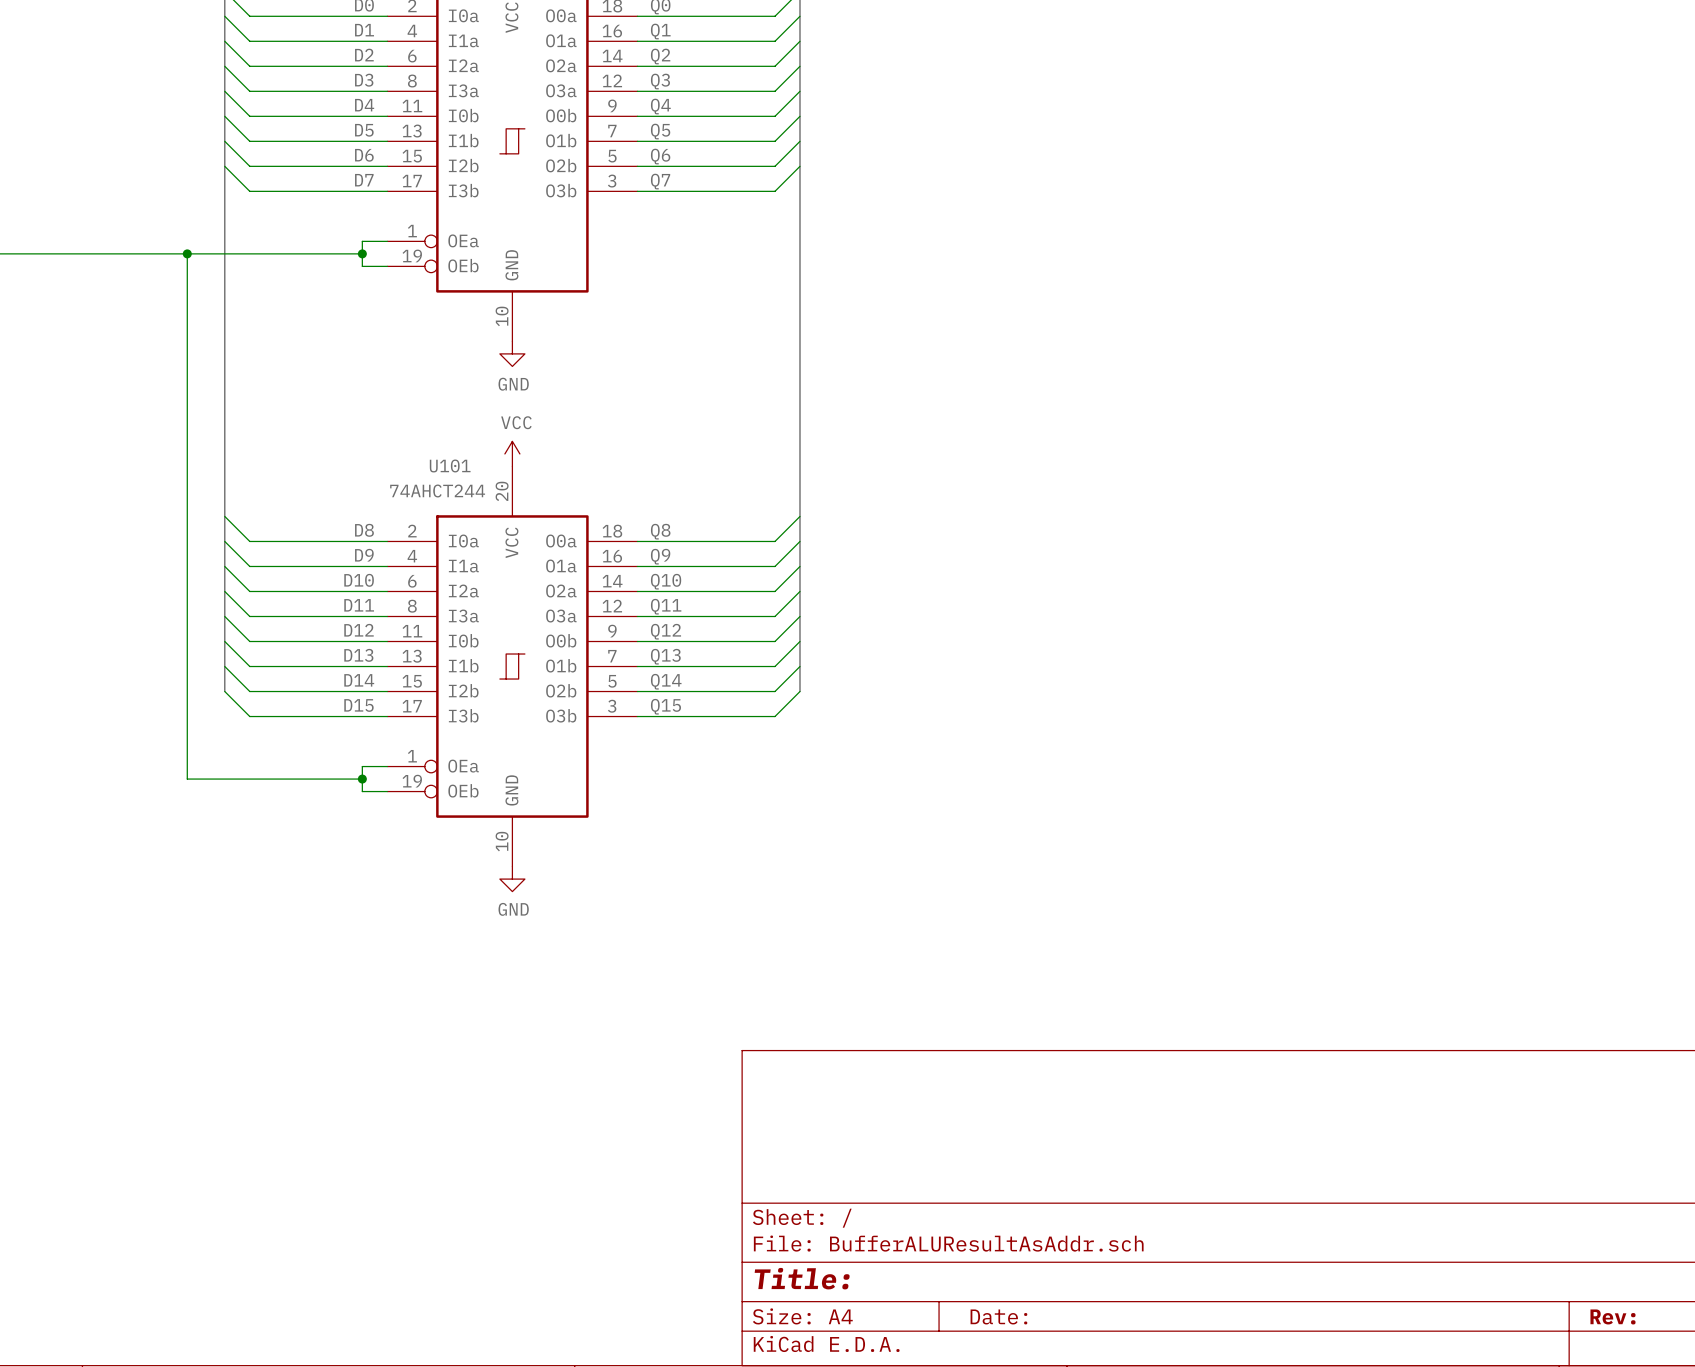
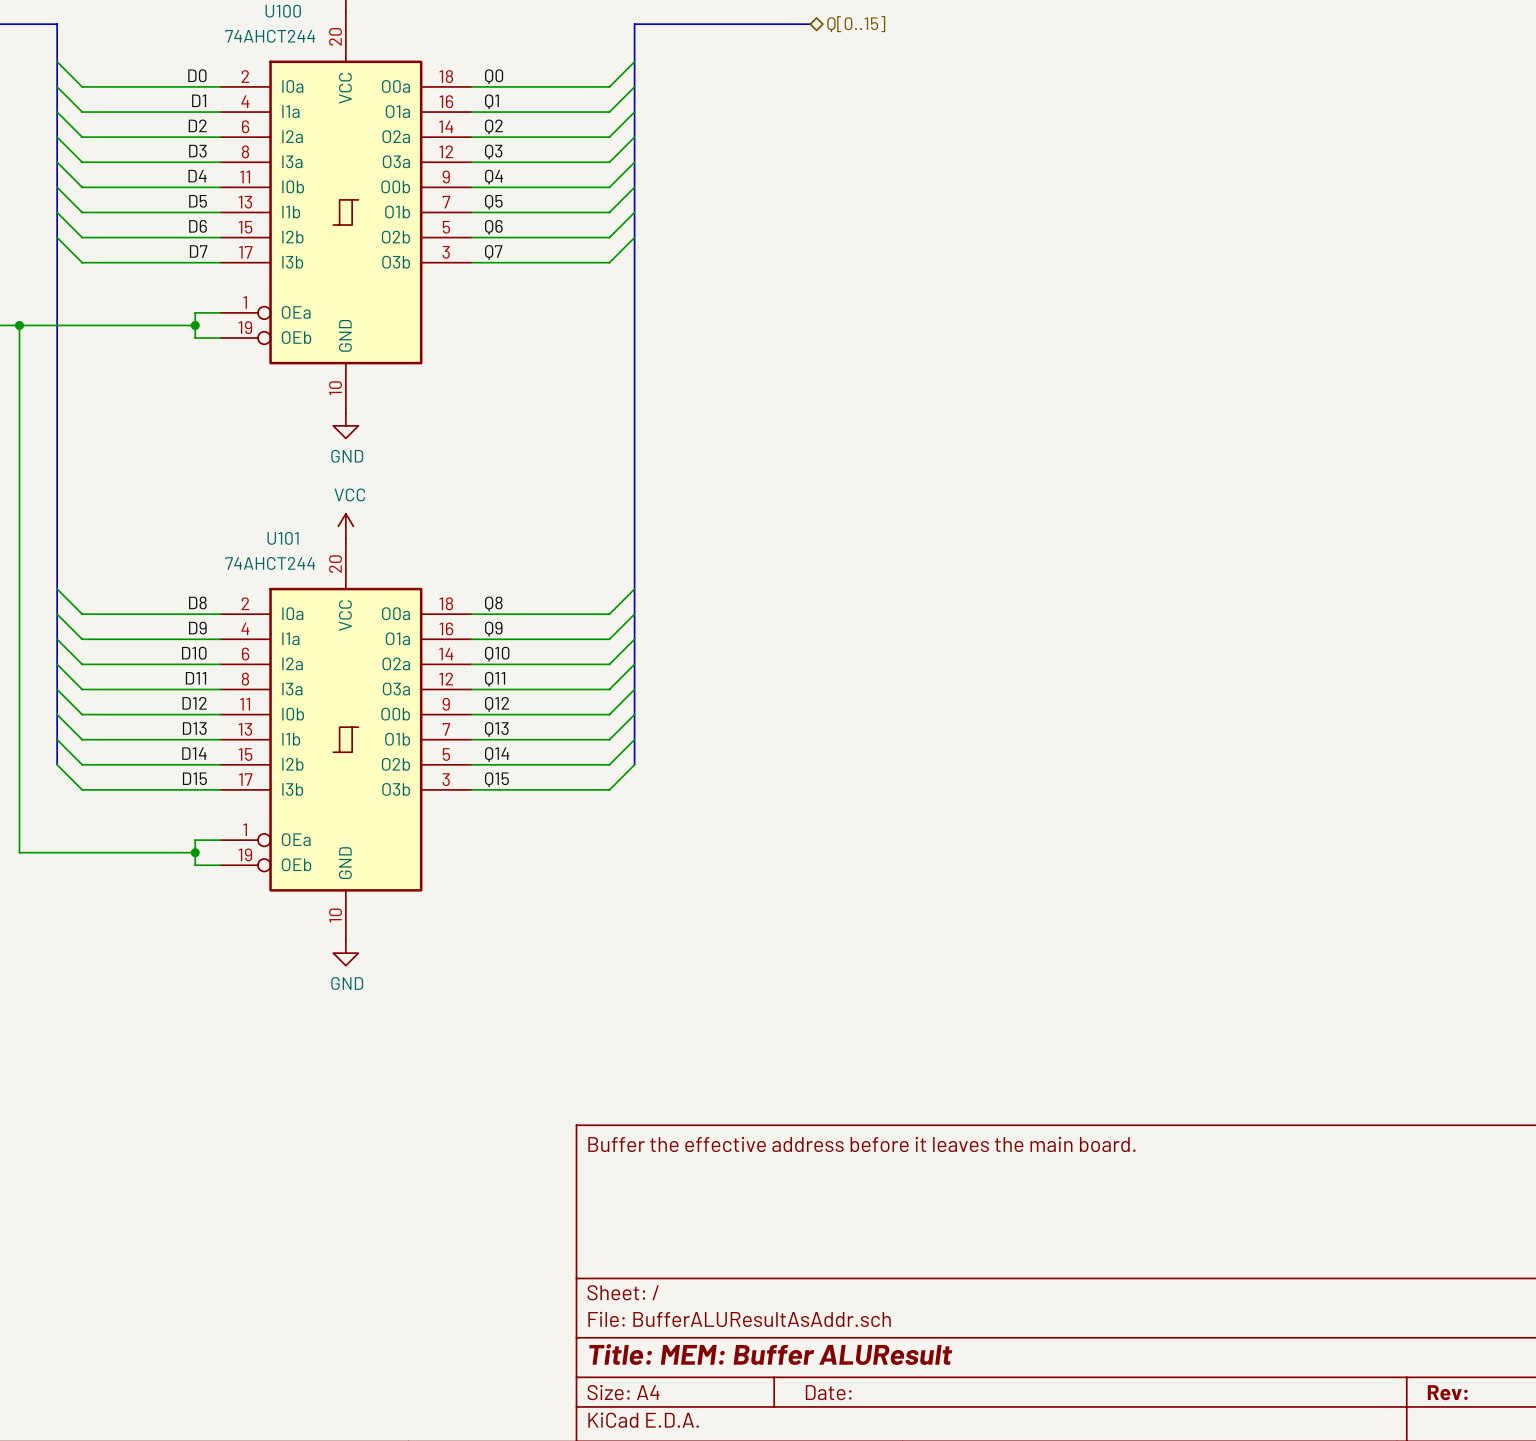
title block: none -> Buffer the effective address before it leaves the main board. (861, 1144)
title block: Title: (802, 1278) -> Title: MEM: Buffer ALUResult (770, 1354)

